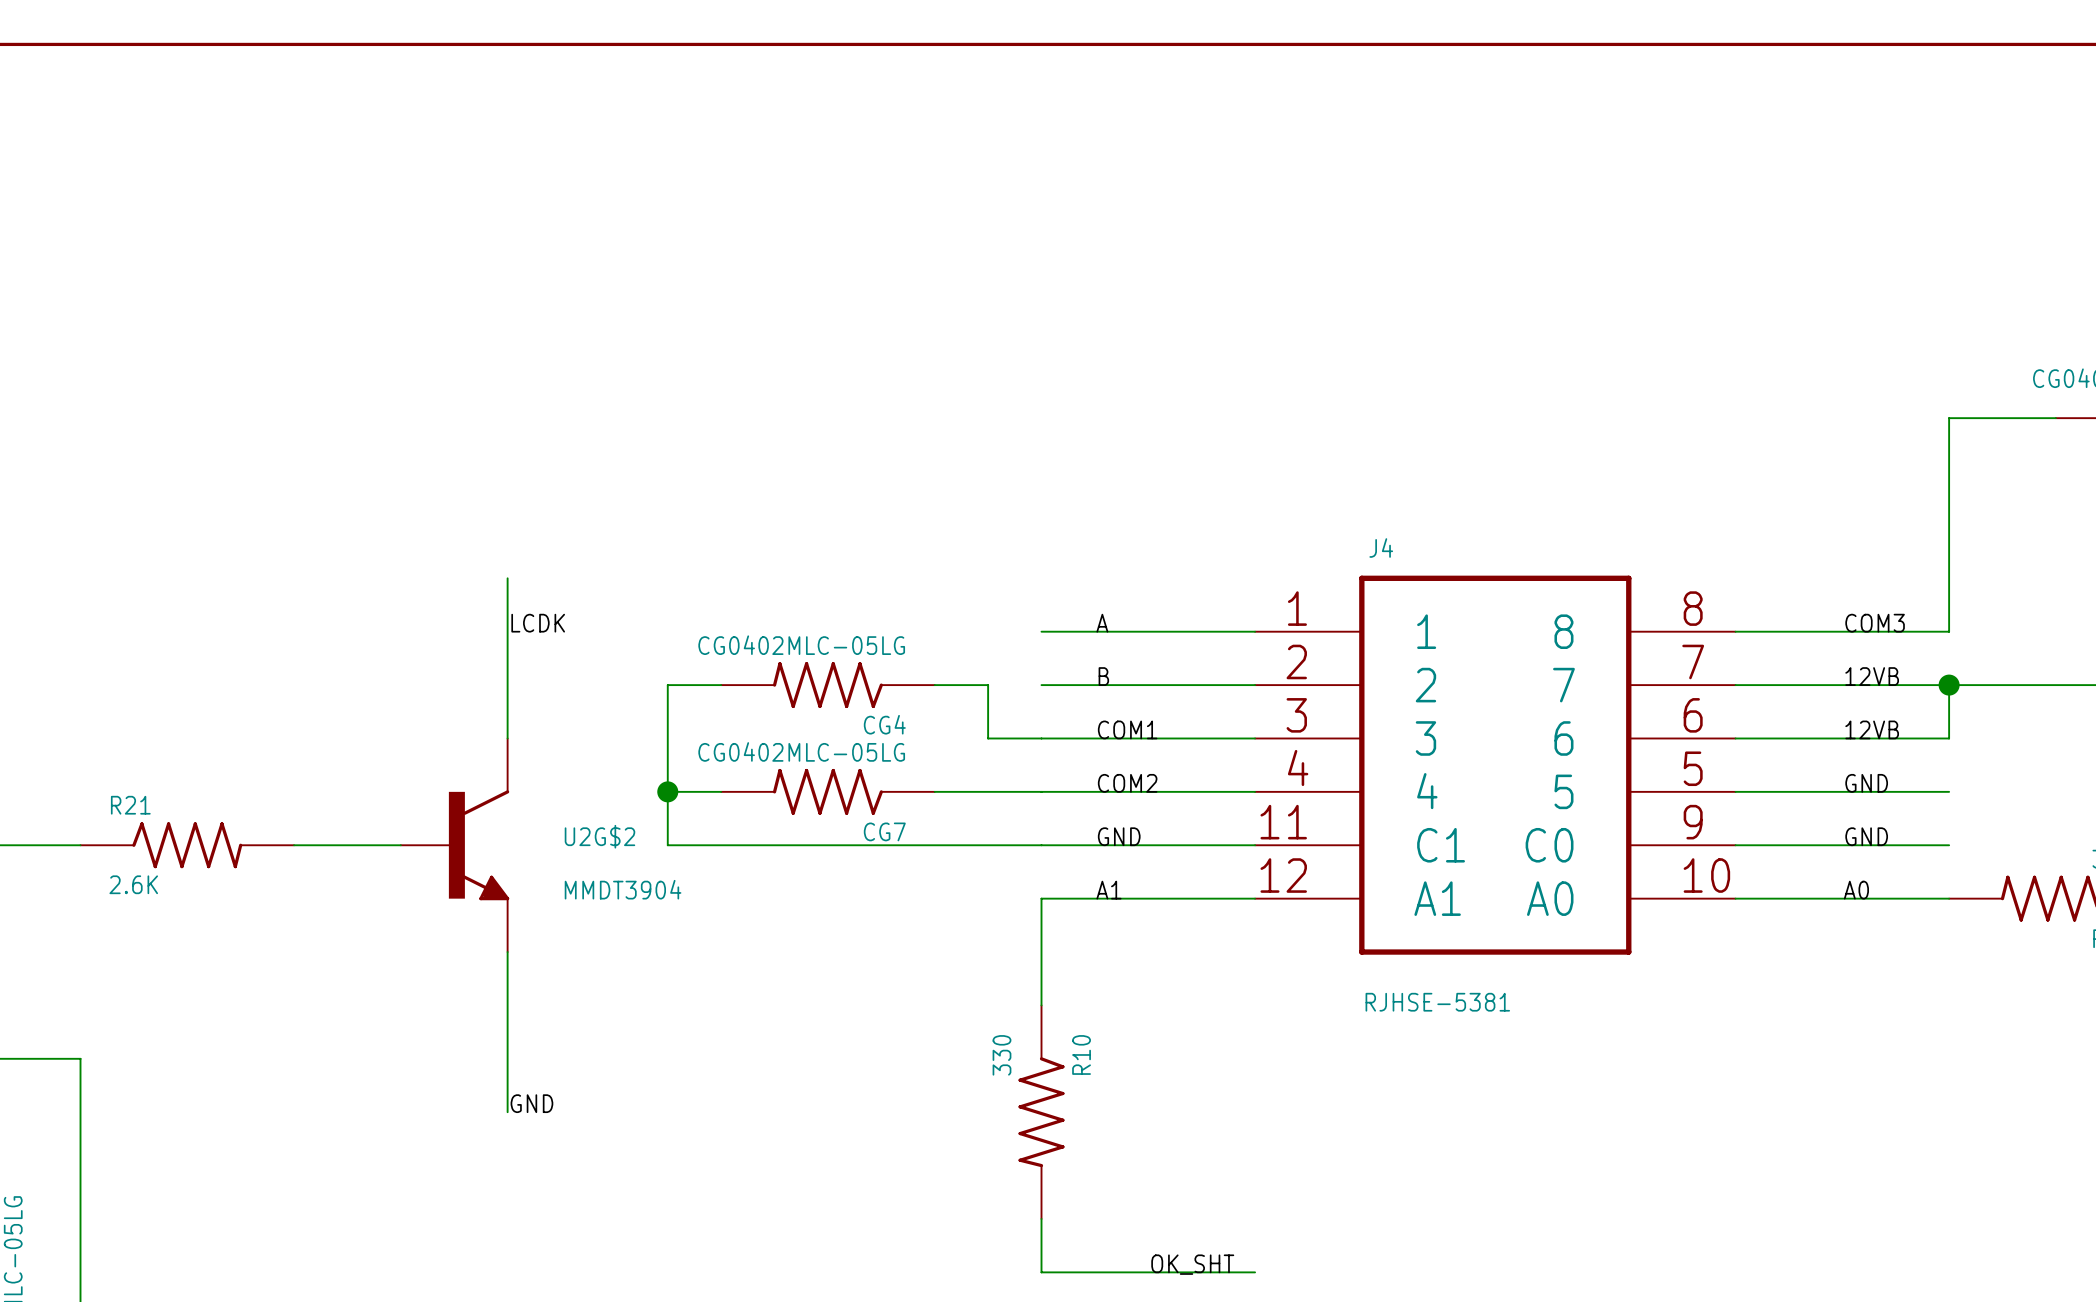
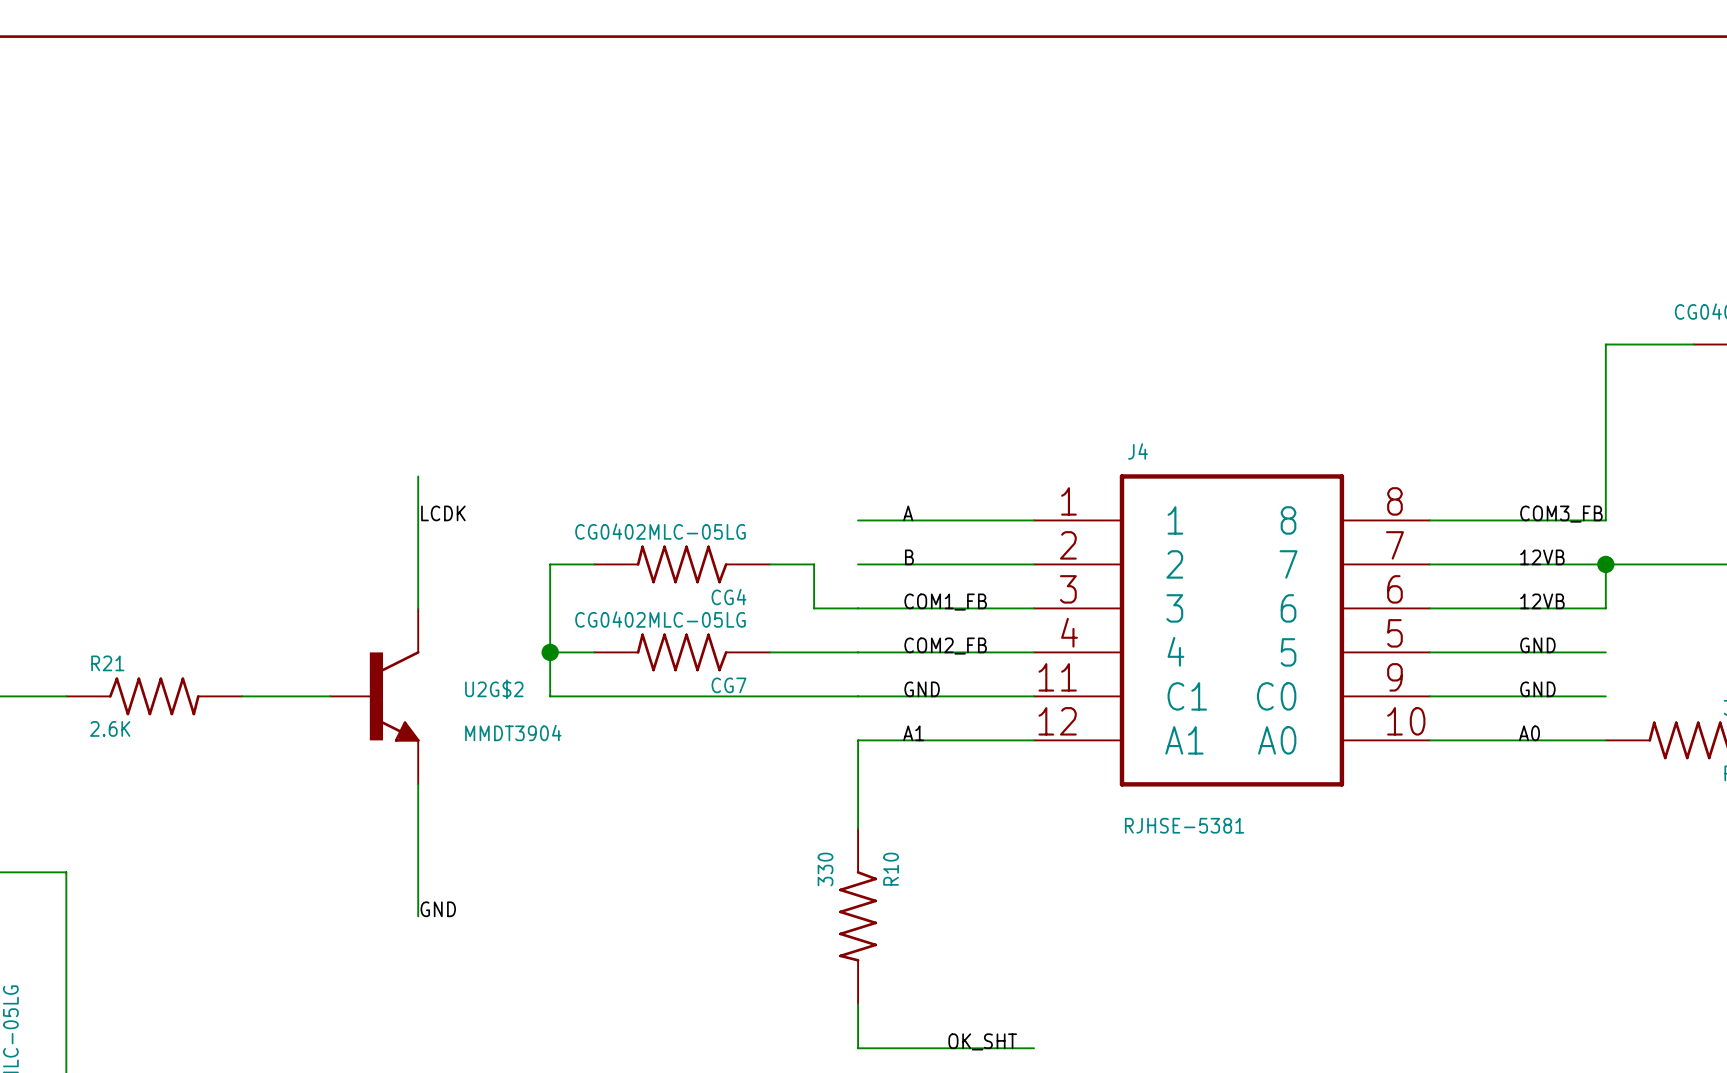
label: COM3 (1875, 623) -> COM3_FB (1561, 514)
label: COM1 (1127, 729) -> COM1_FB (945, 602)
label: COM2 (1127, 783) -> COM2_FB (945, 646)

